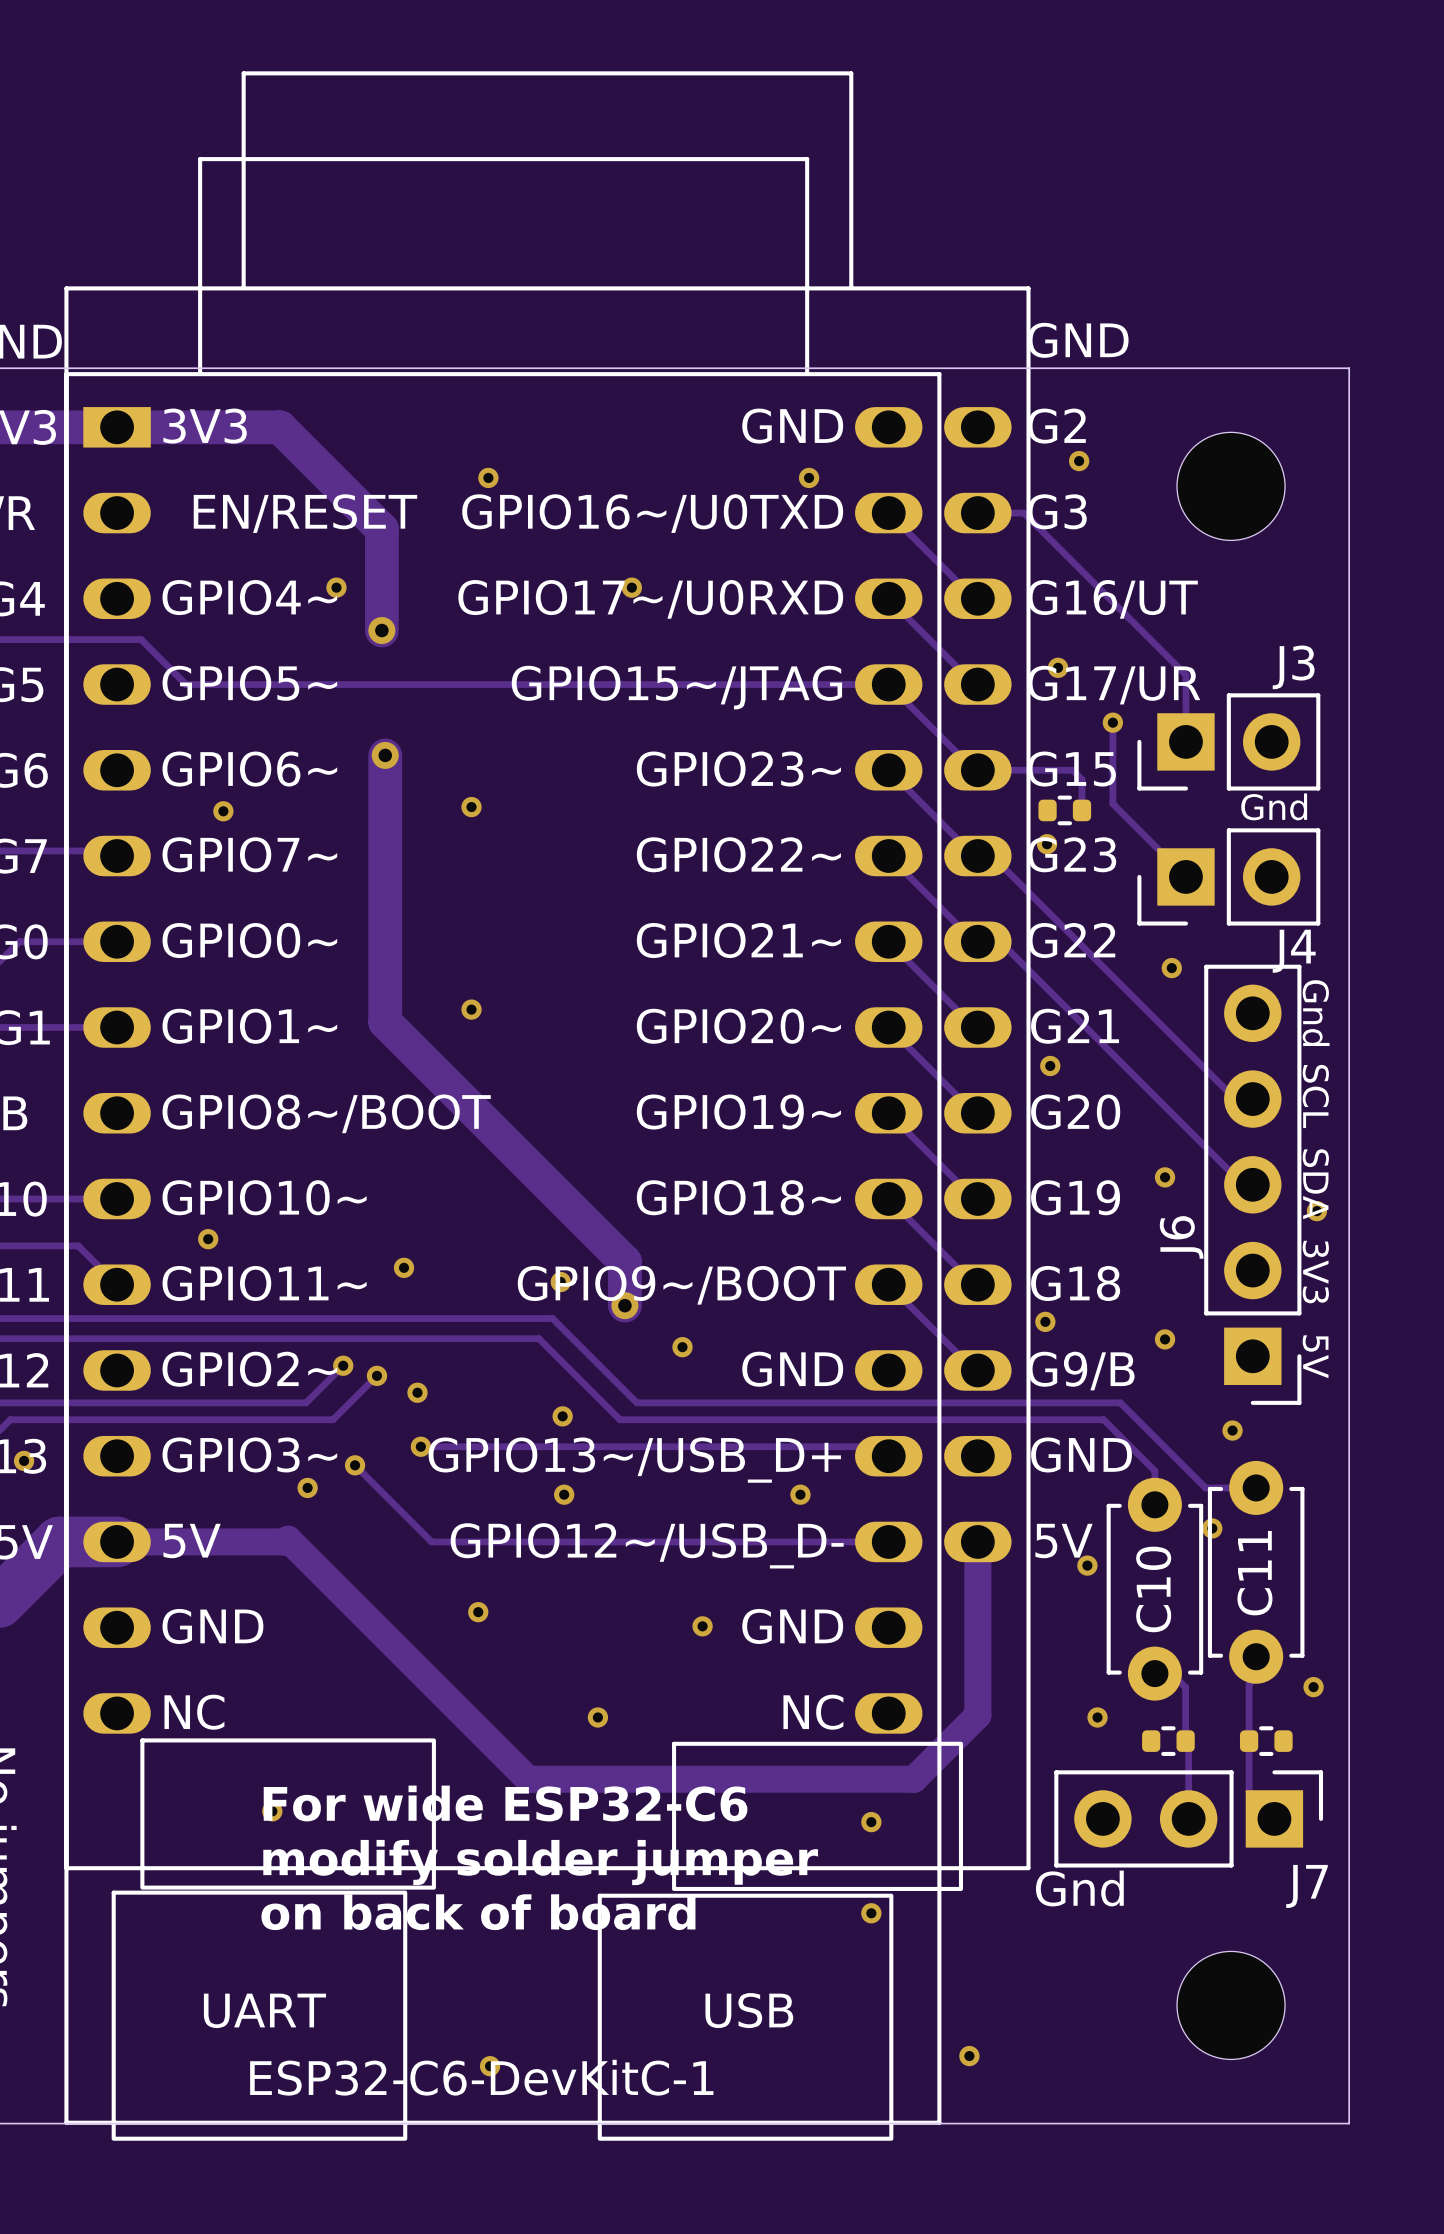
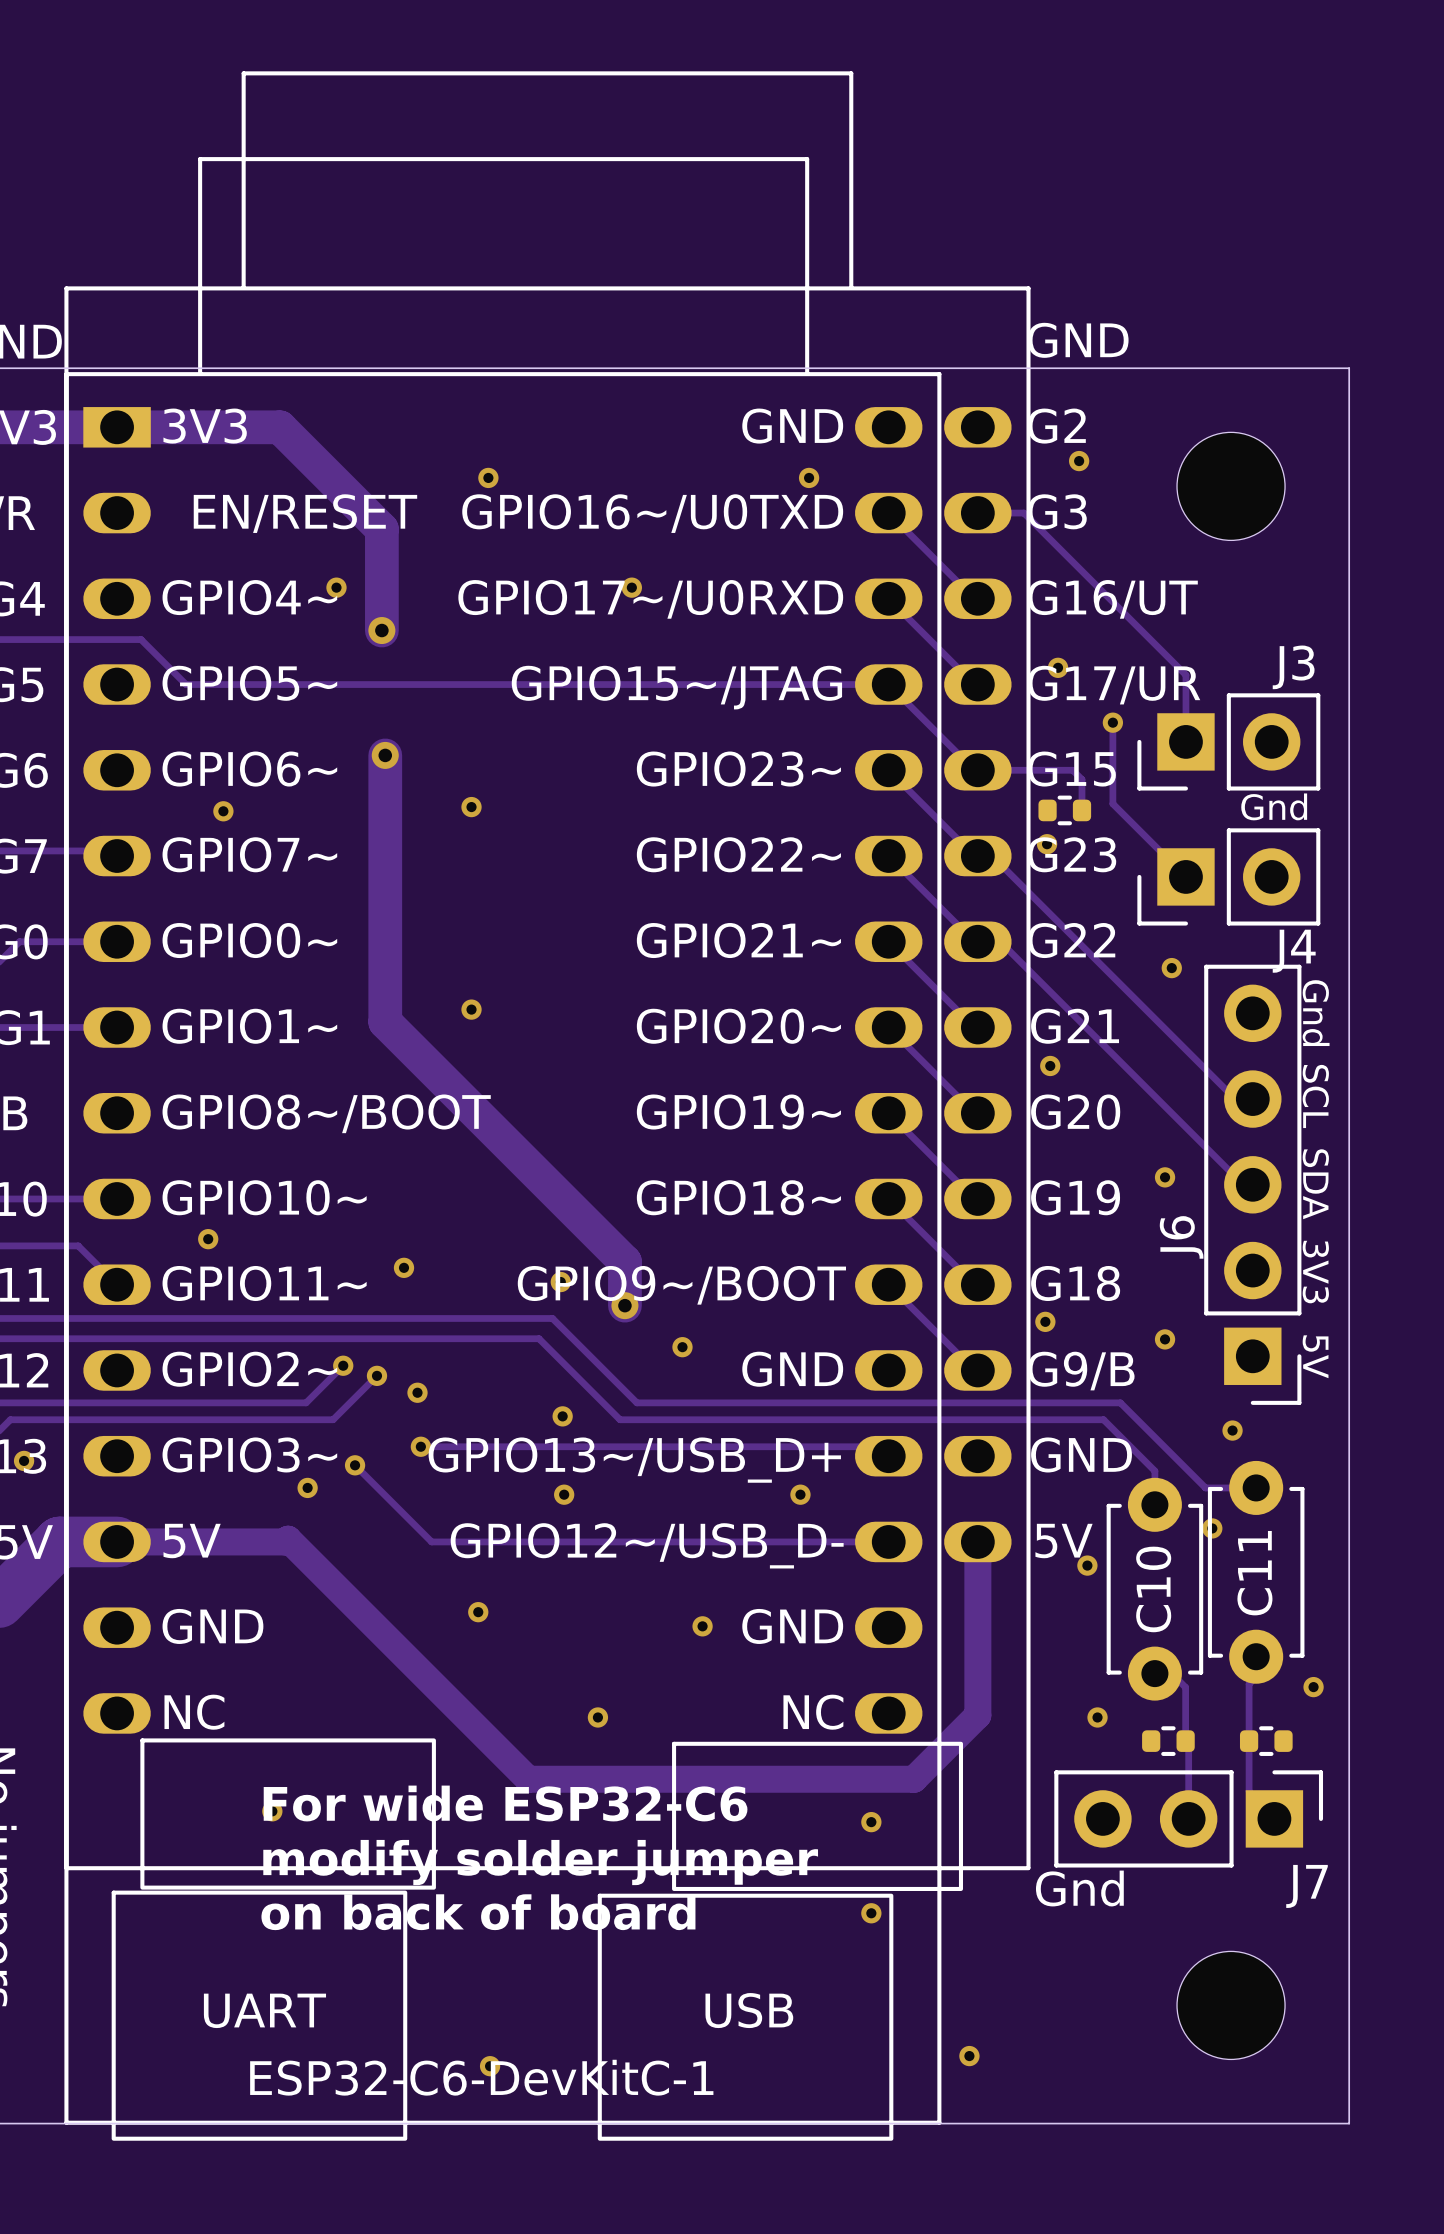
via: (1316, 1211) -> none

